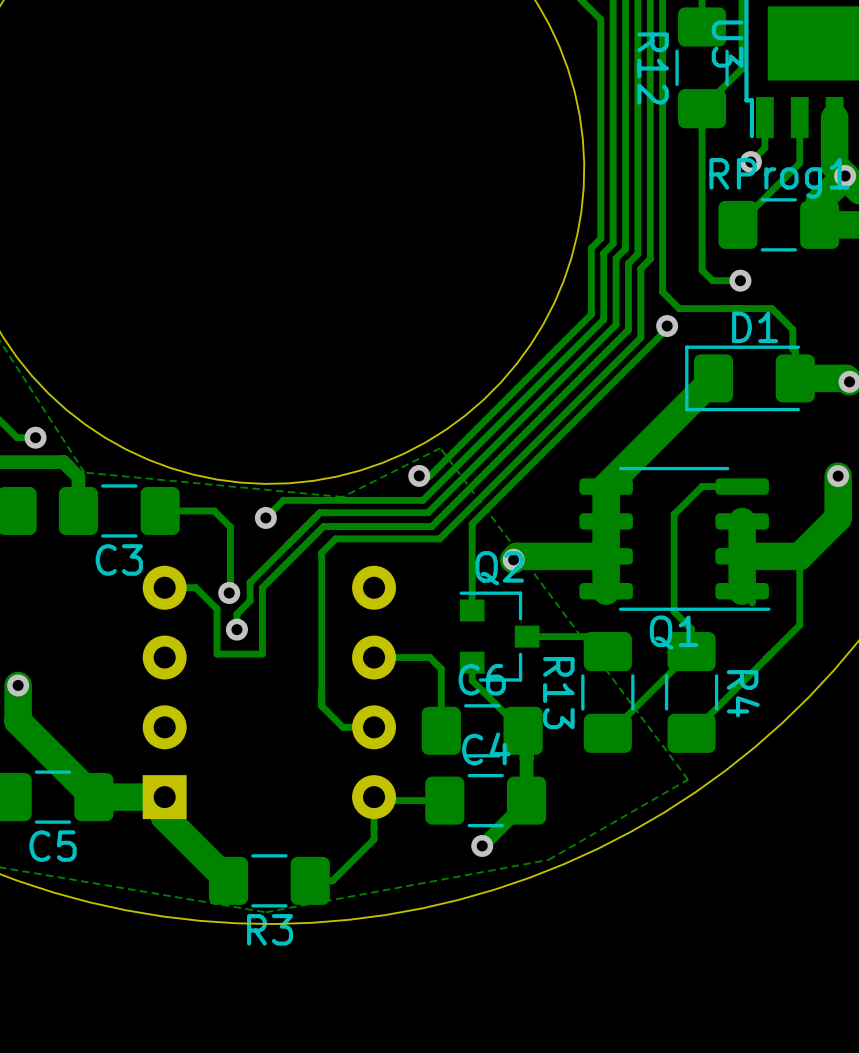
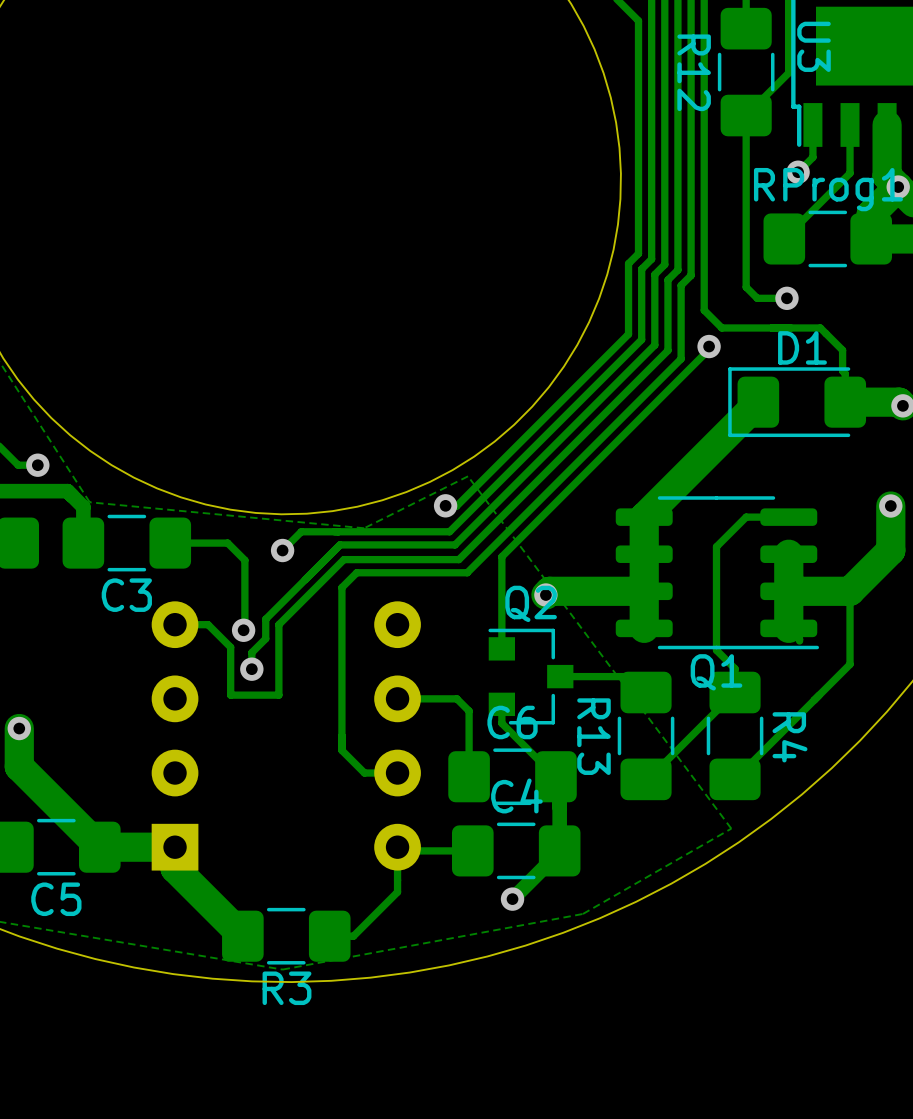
U3 name position: U3 (727, 44) -> U3 (814, 46)

